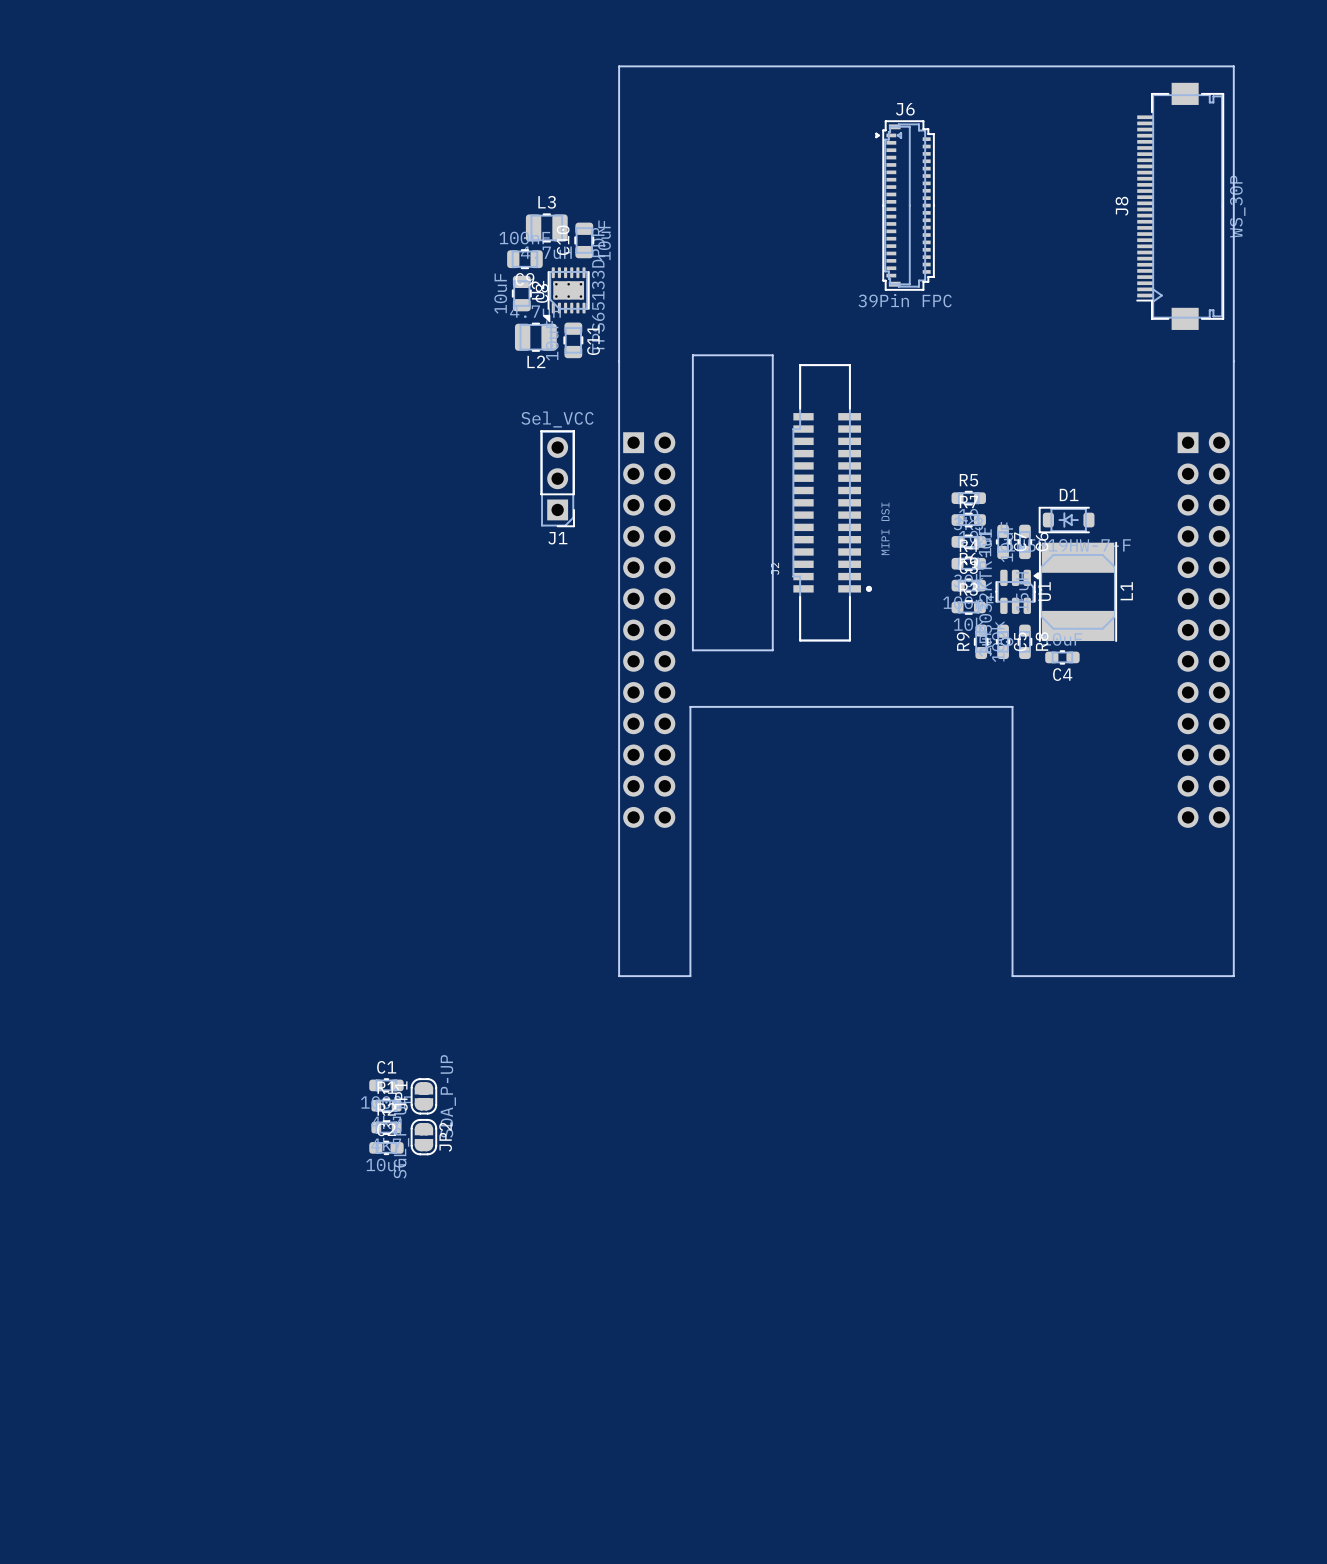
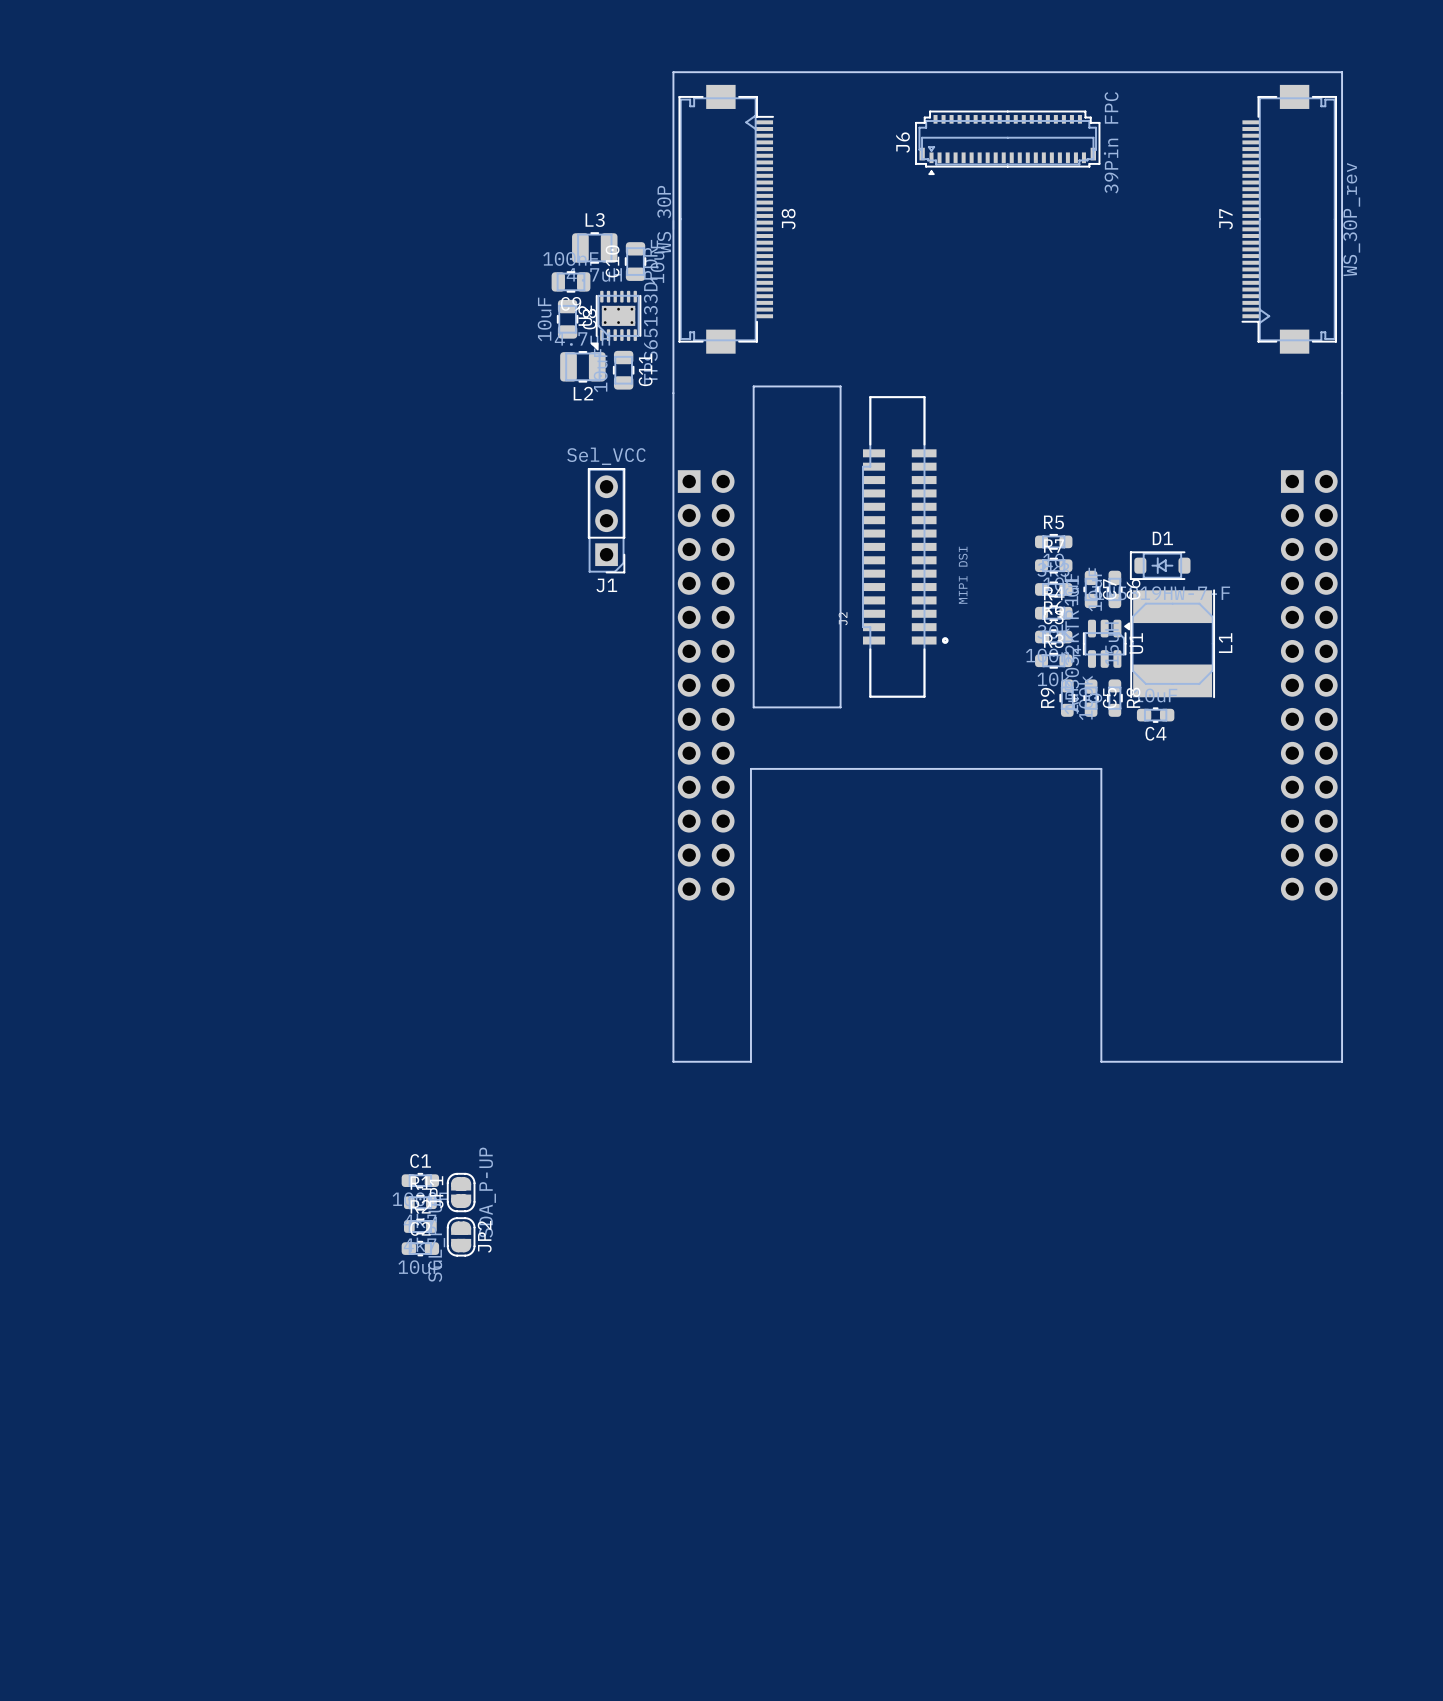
J7: none -> WS_30P_rev (1289, 219)
J6 rotation: 0° (905, 205) -> 90° counterclockwise (1007, 142)
J8 rotation: 0° (1180, 206) -> 180° (726, 219)
J8 position: (1180, 206) -> (726, 219)

